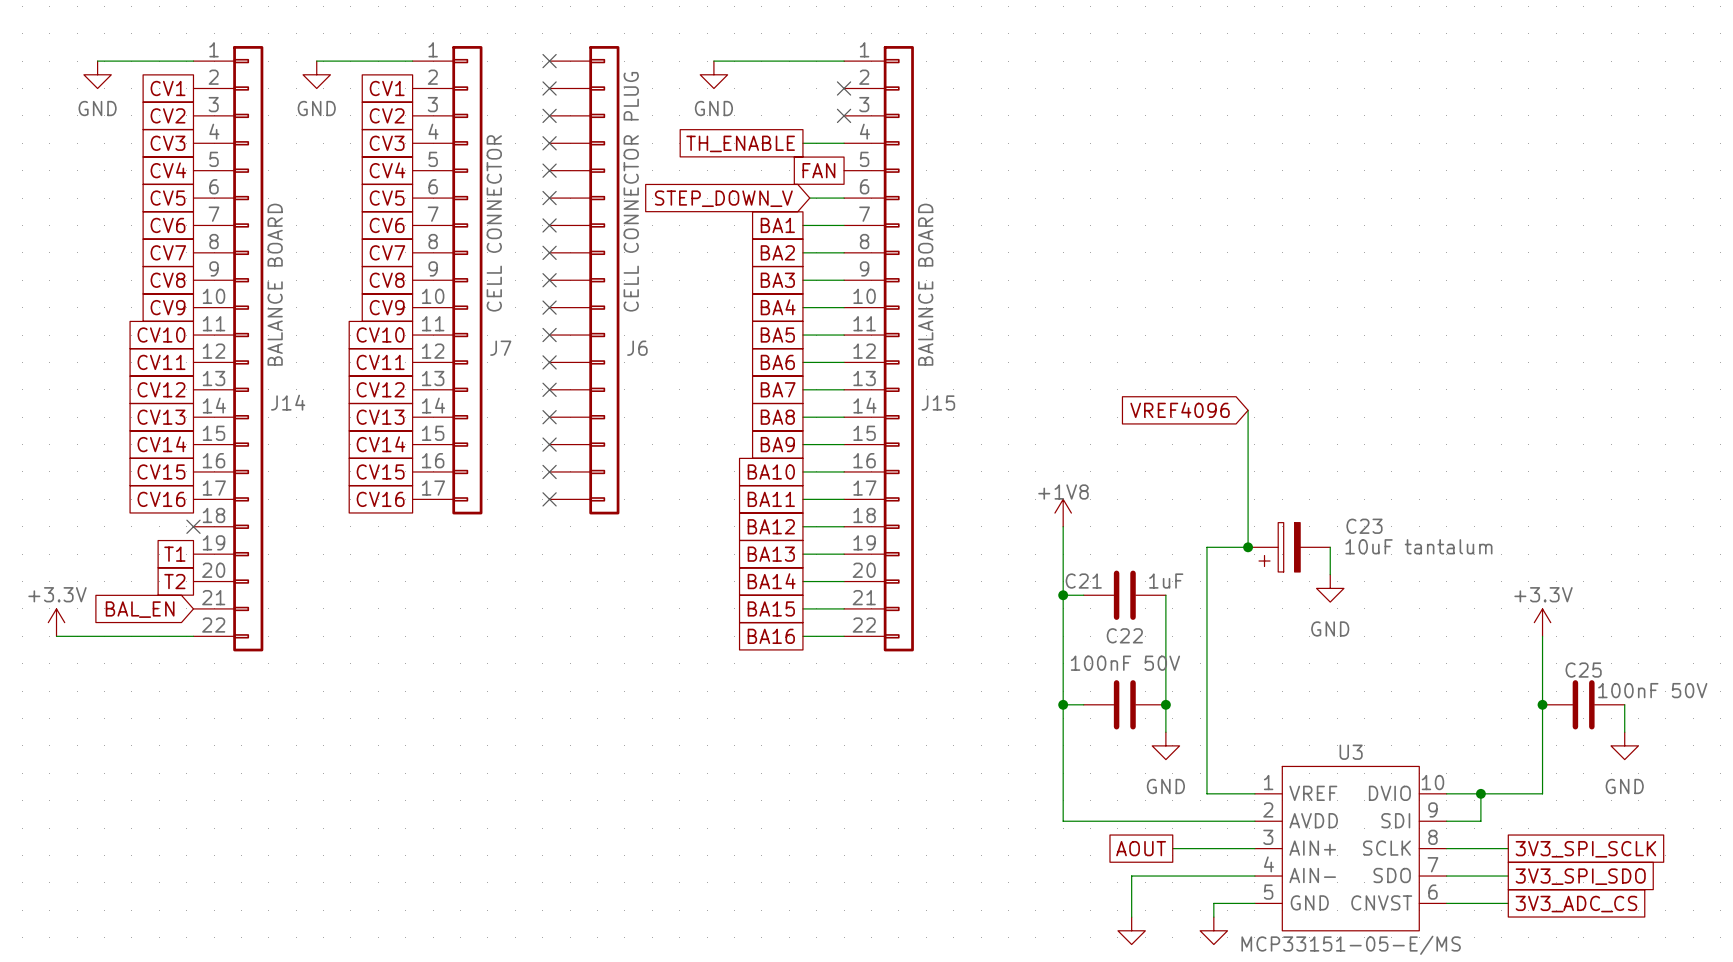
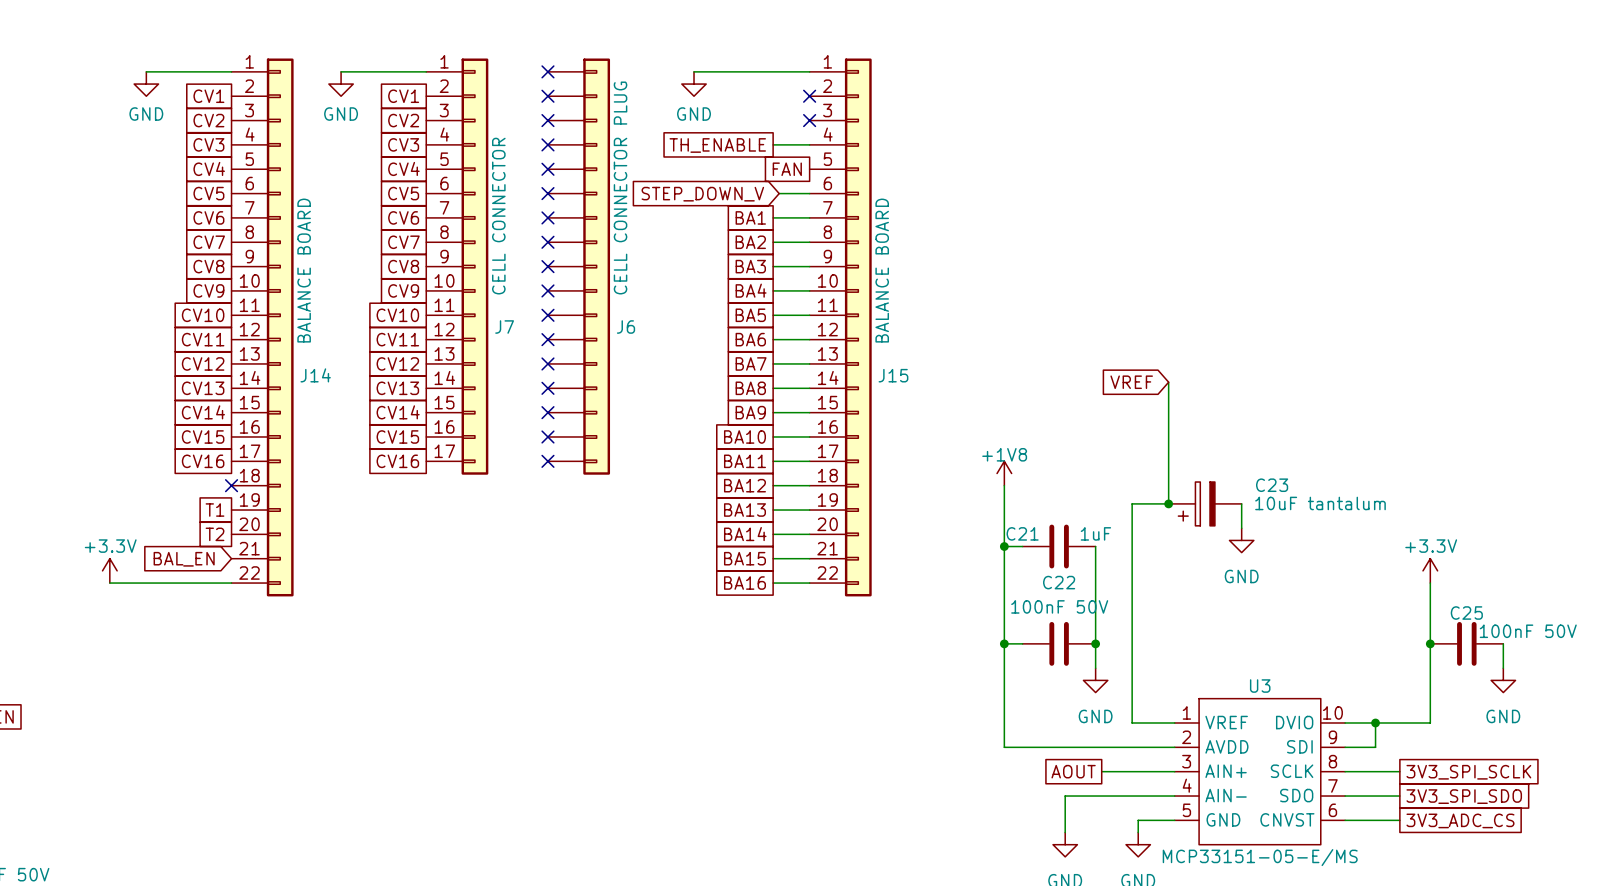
global label: VREF4096 (1180, 410) -> VREF (1131, 382)

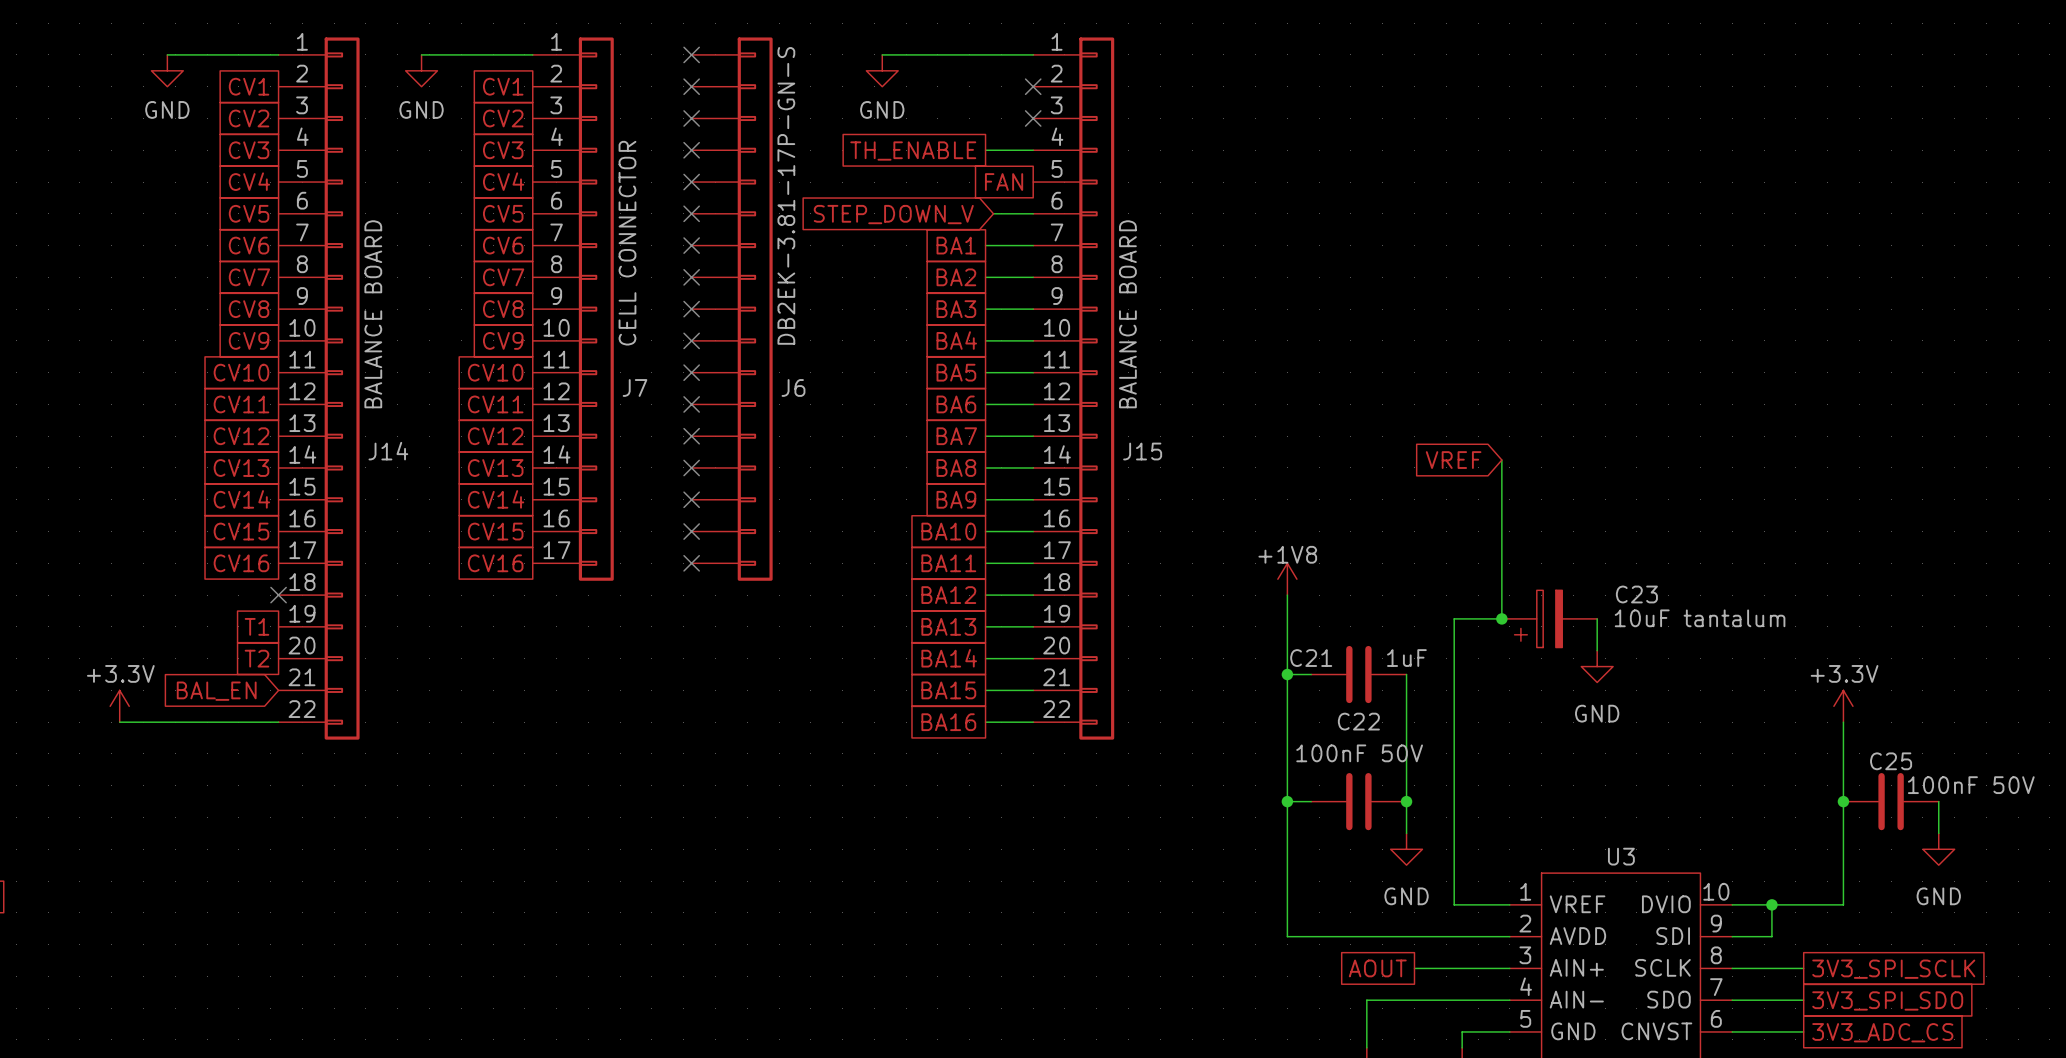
J6 value: CELL CONNECTOR PLUG (620, 187) -> DB2EK-3.81-17P-GN-S (786, 195)

